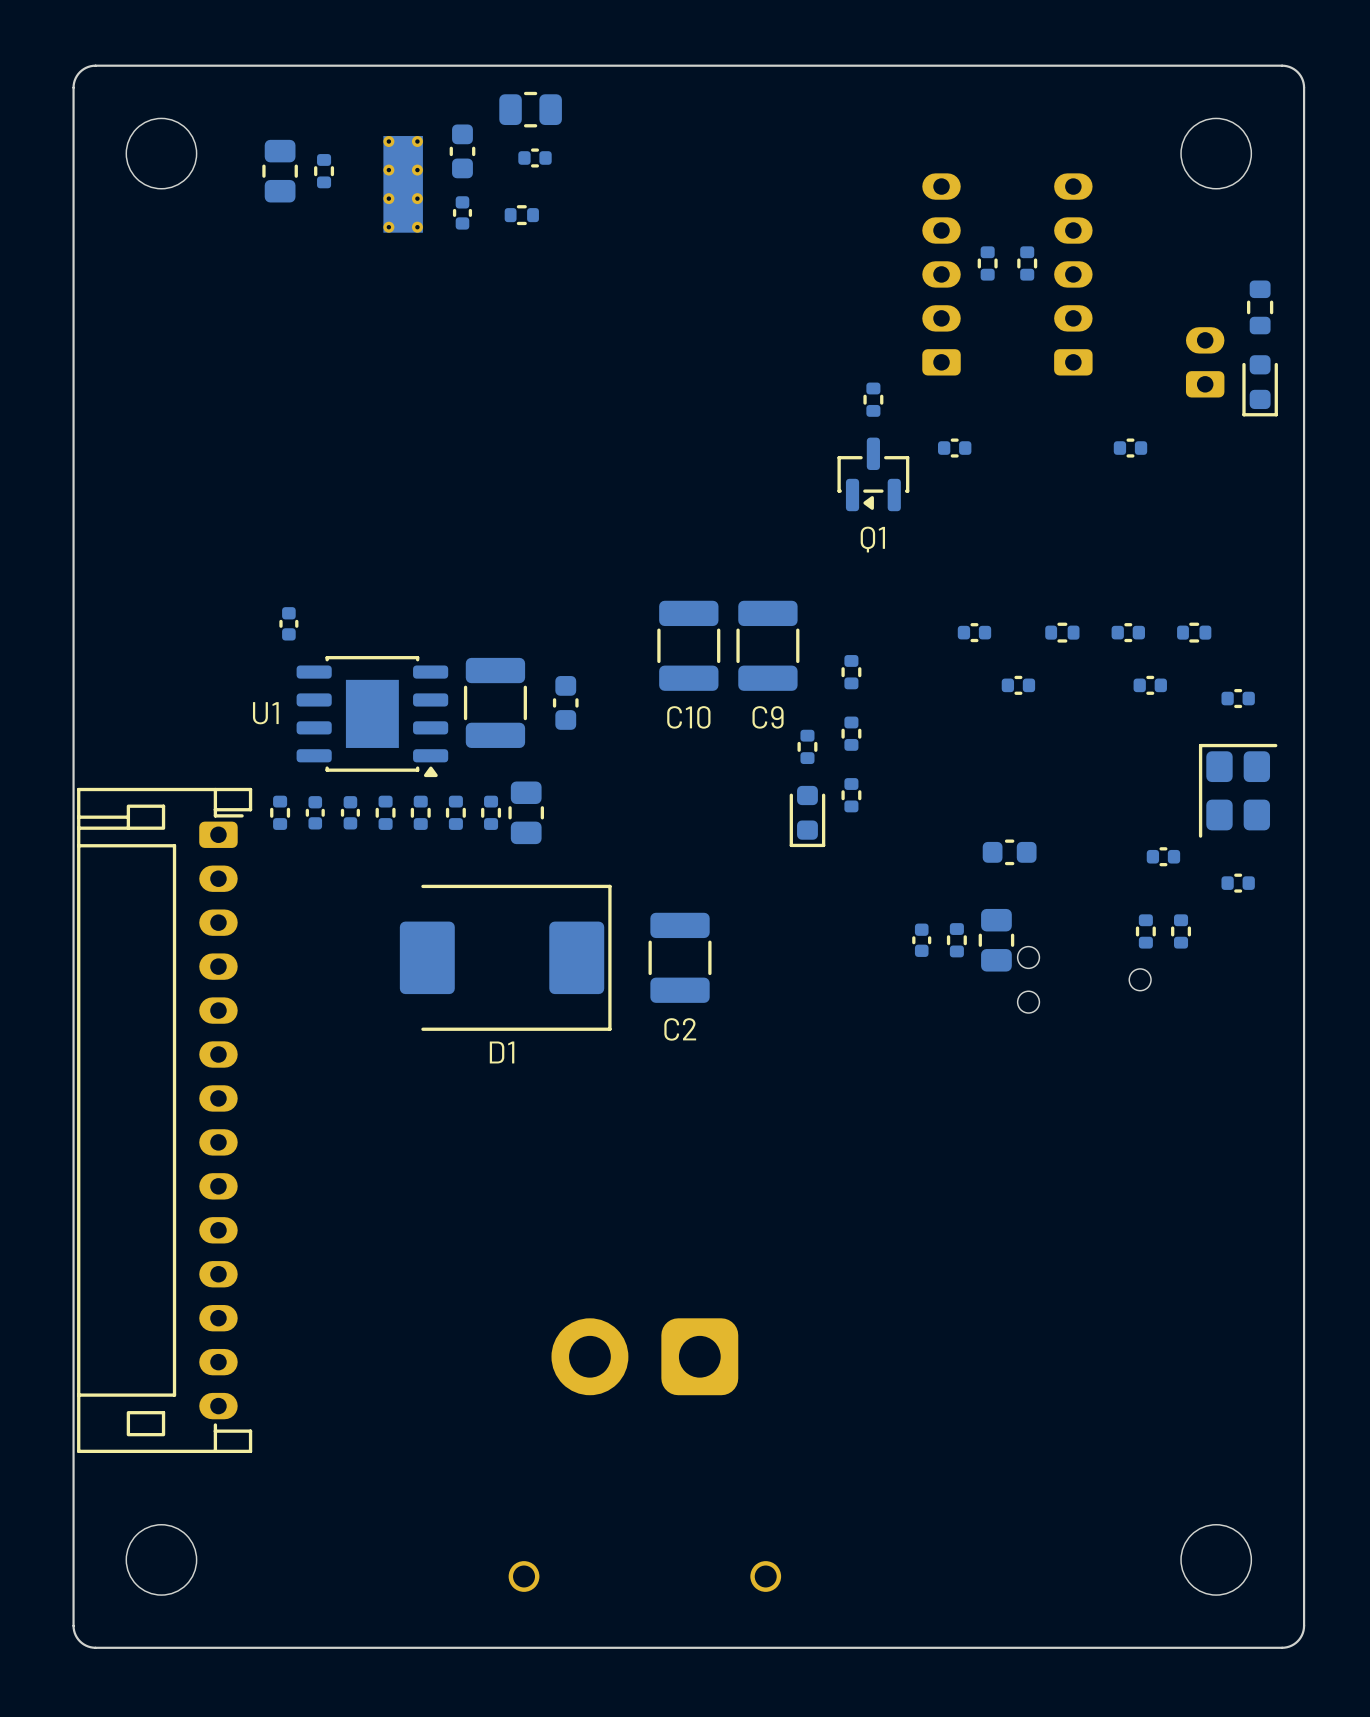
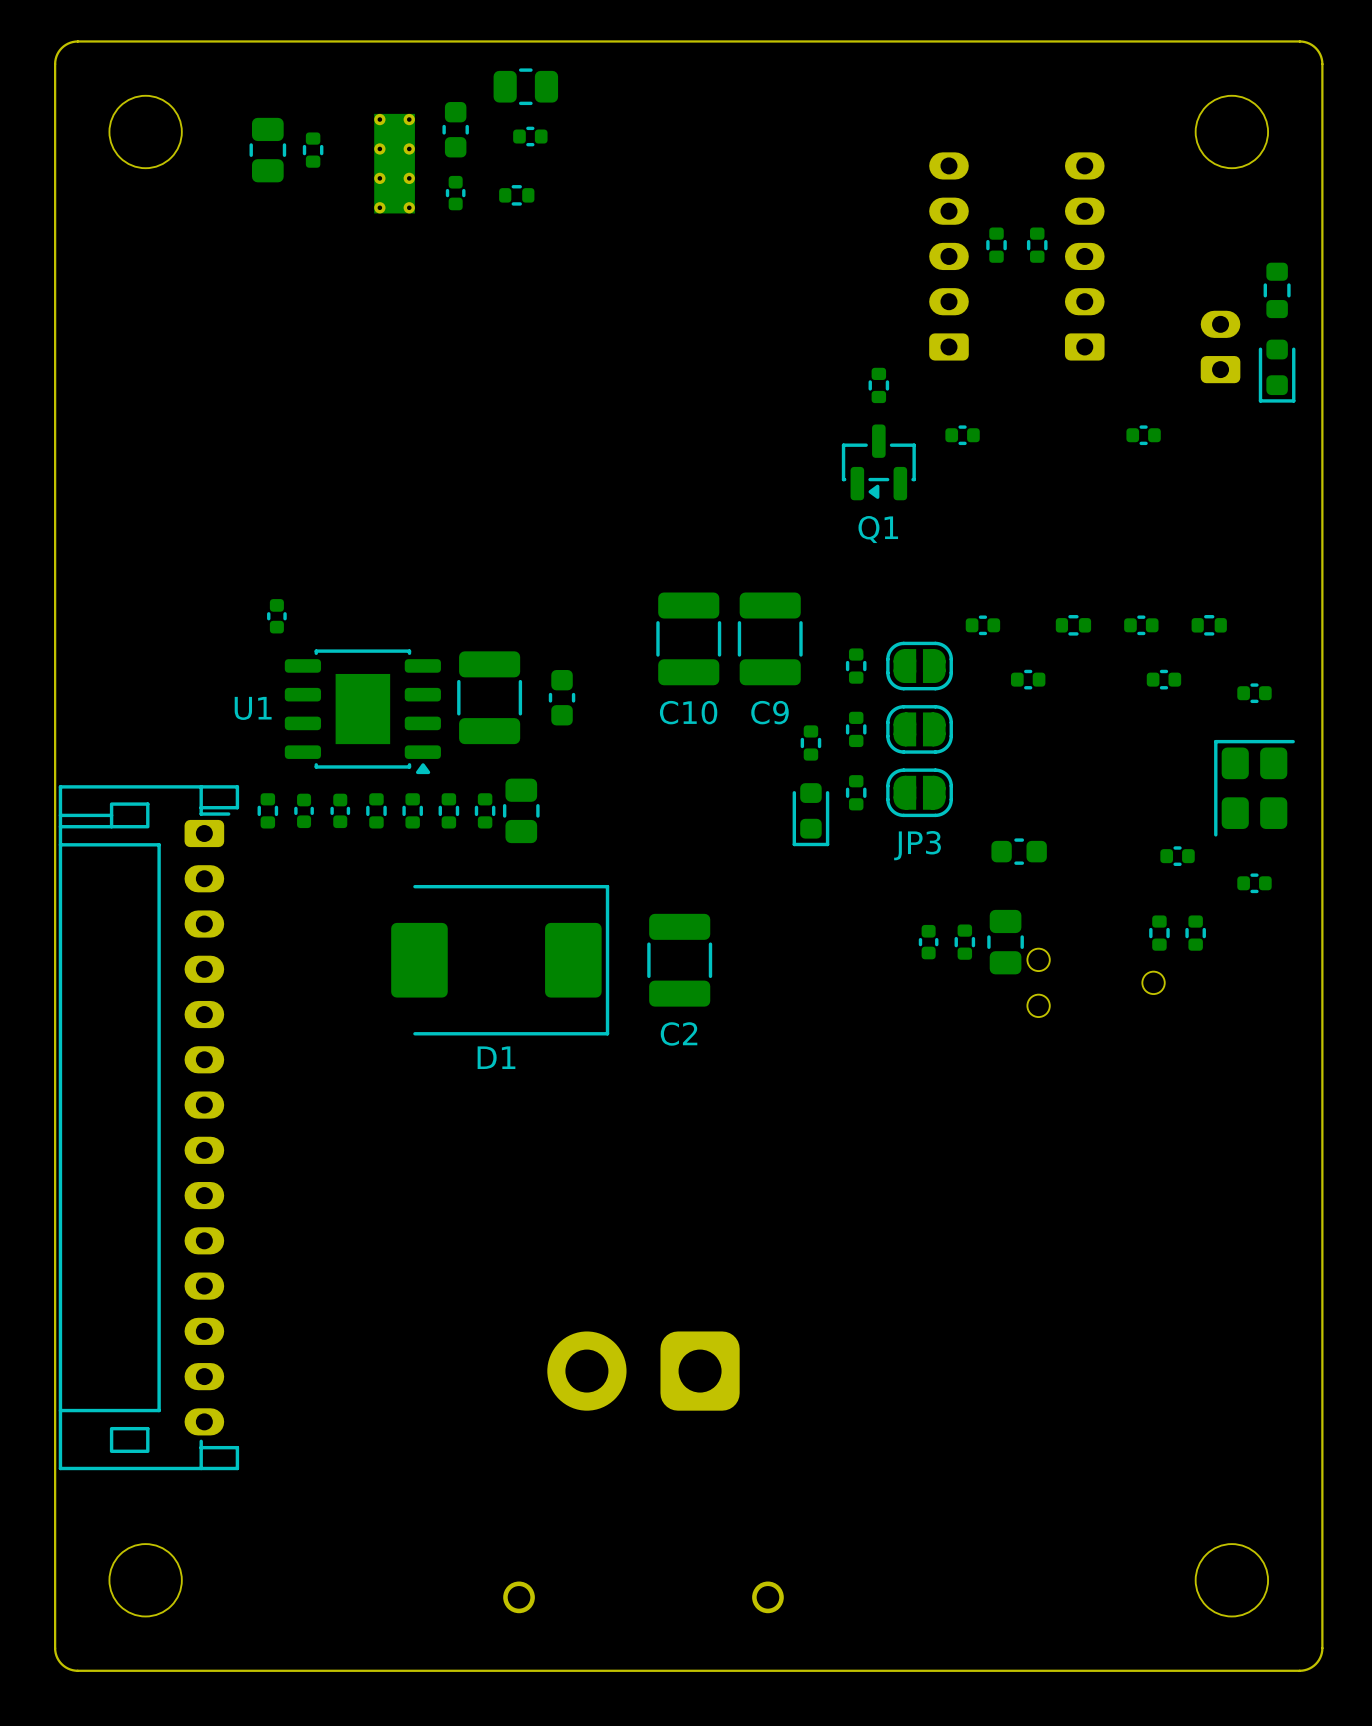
part: none -> (919, 666)
part: none -> (919, 729)
JP3: none -> (919, 792)

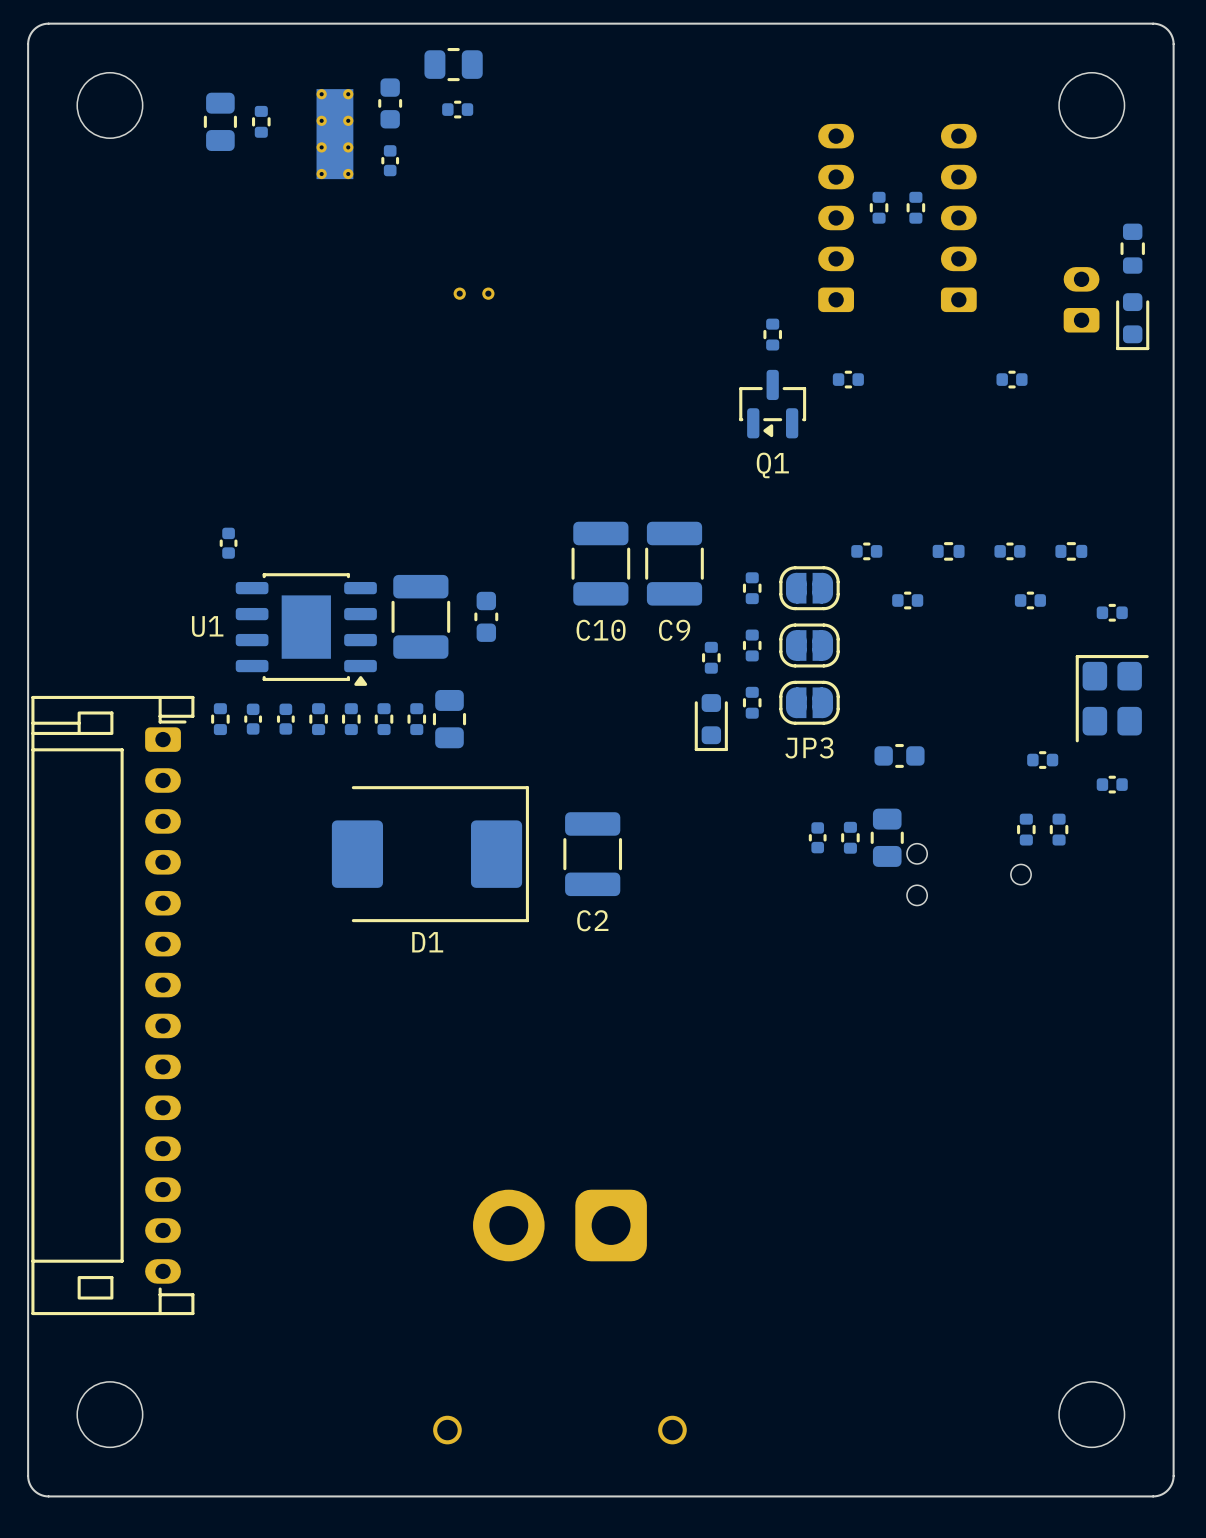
part: (516, 195) -> none
part: none -> (459, 293)
part: none -> (488, 293)

